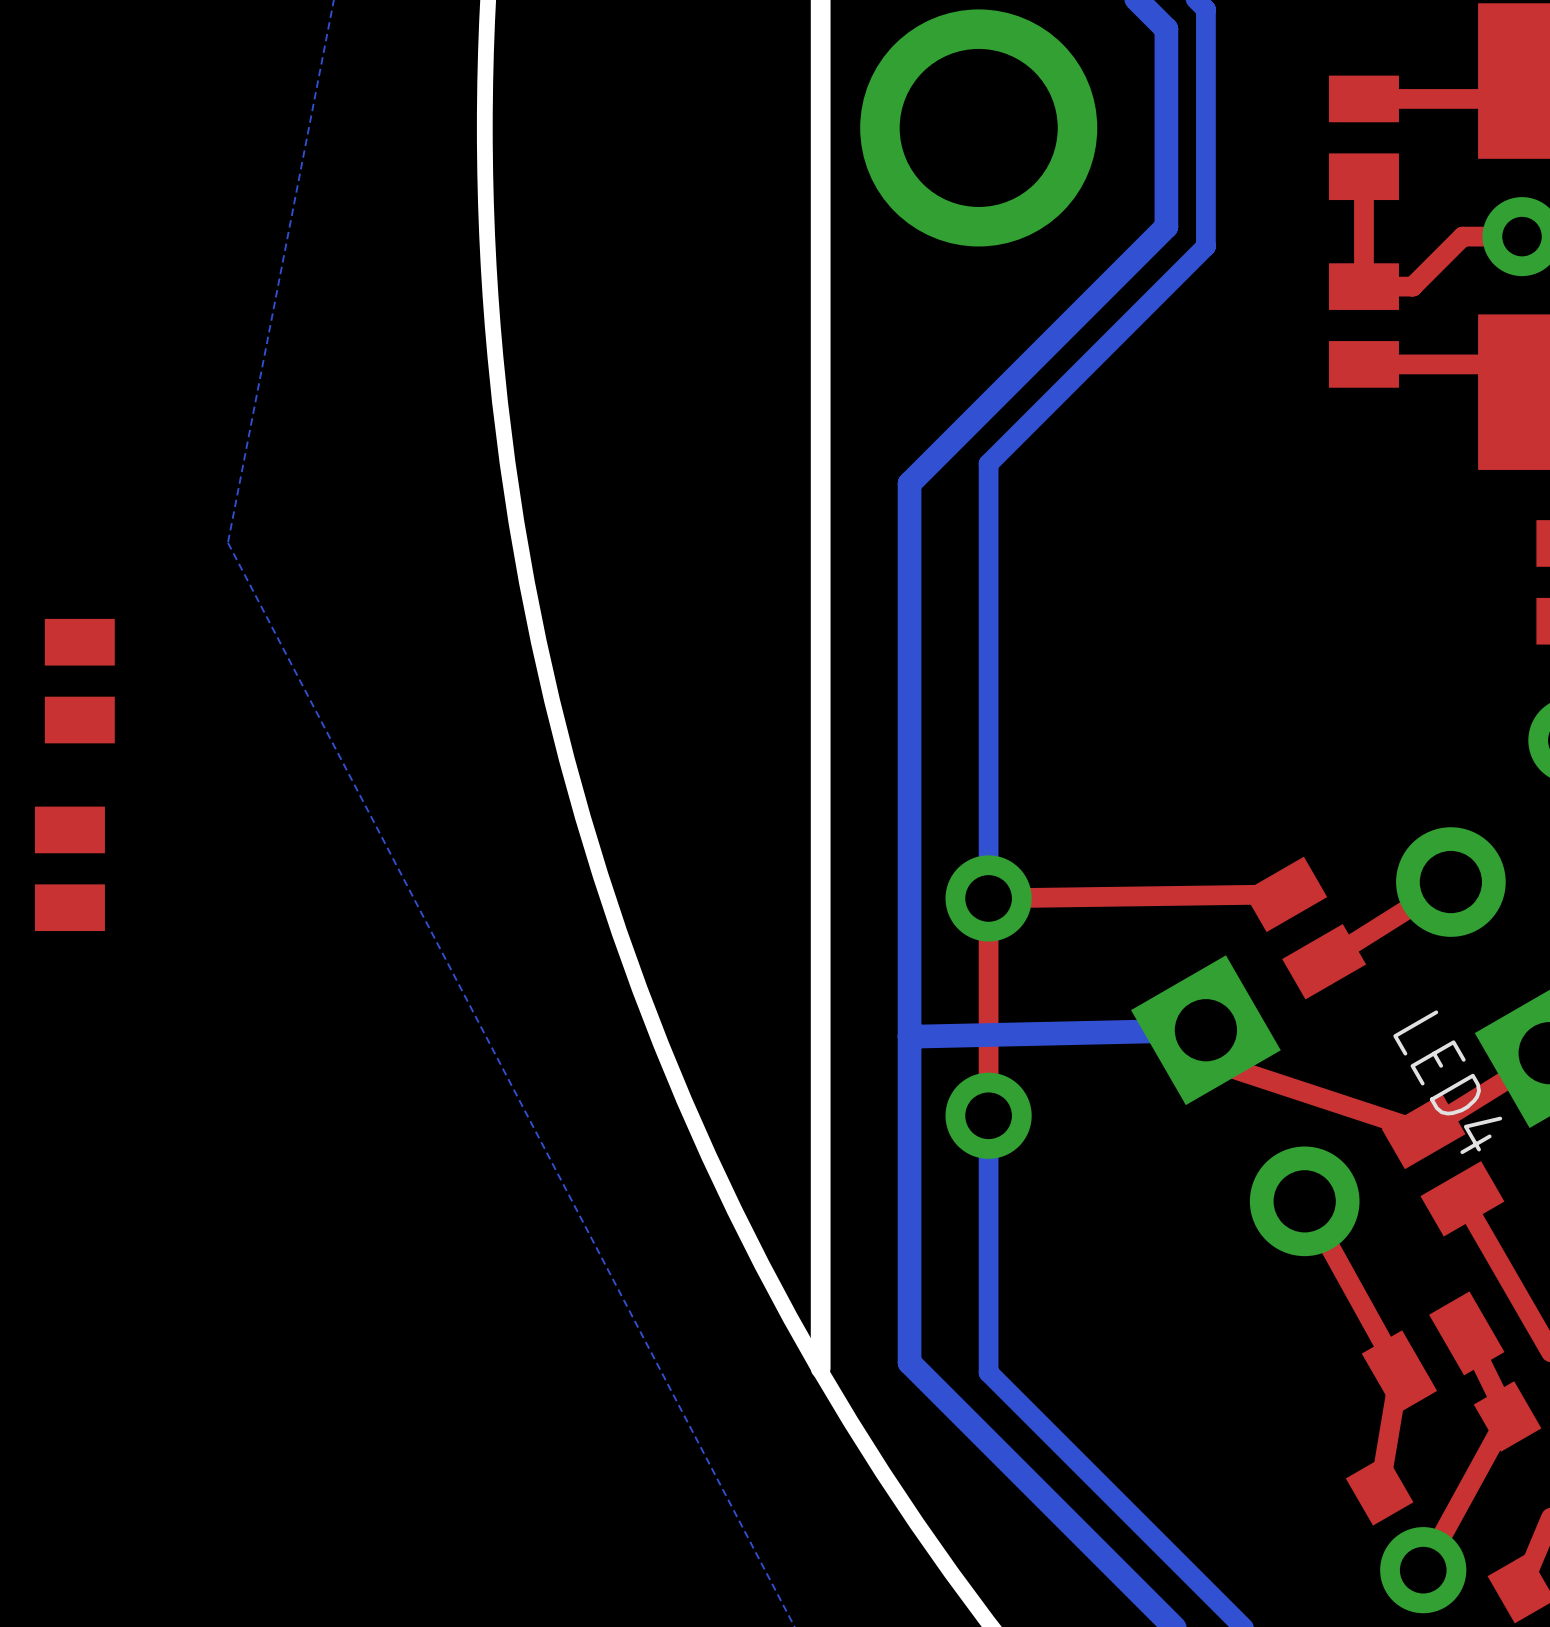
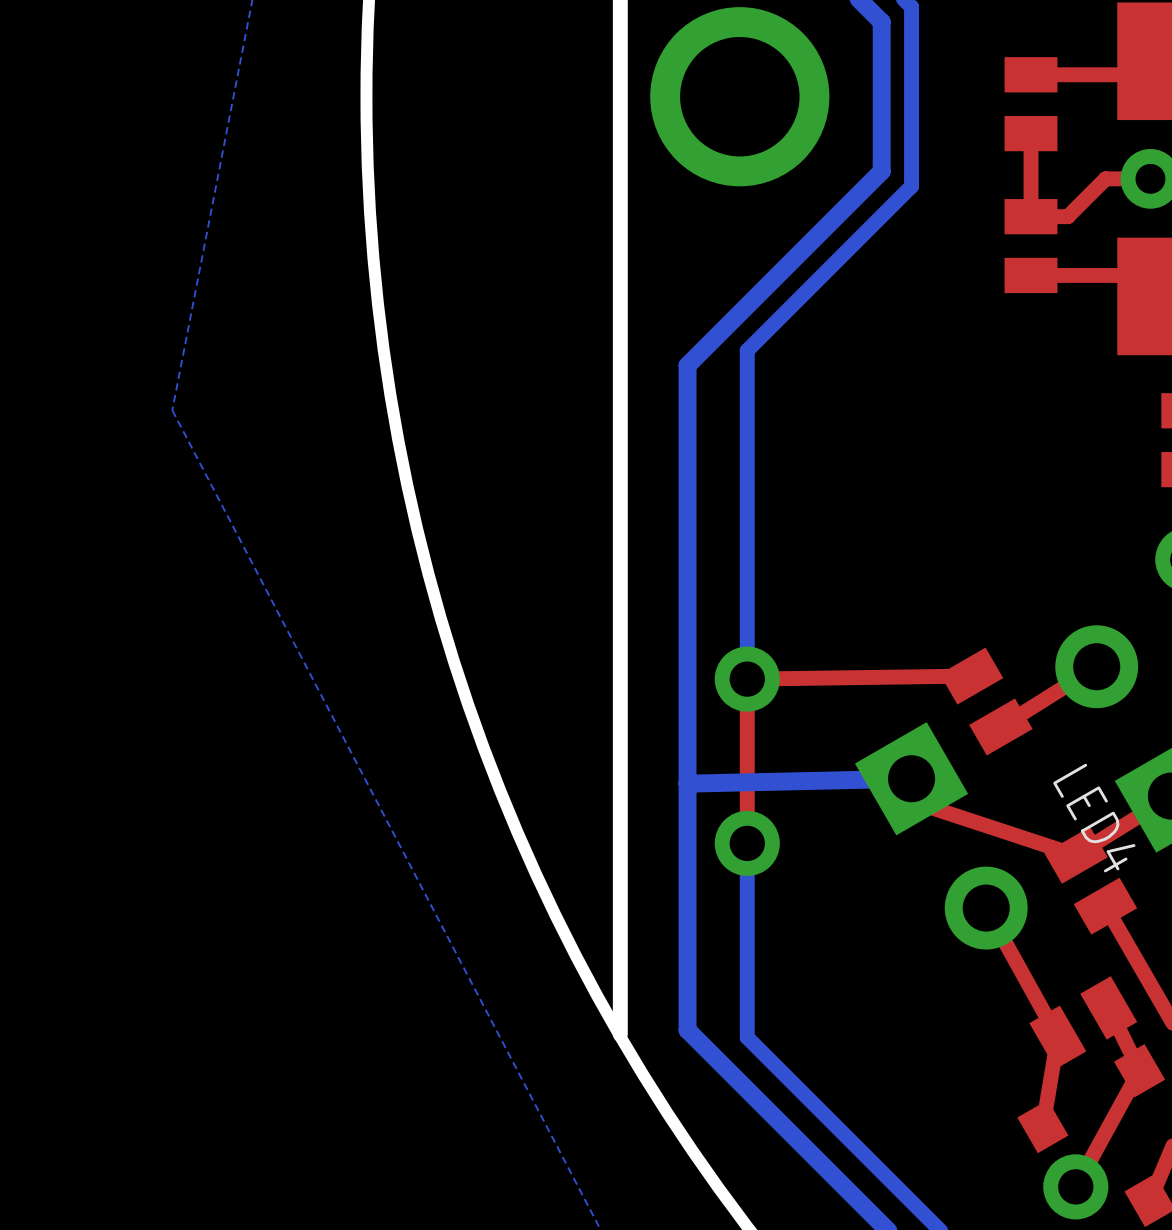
part: (79, 681) -> none
part: (69, 868) -> none

